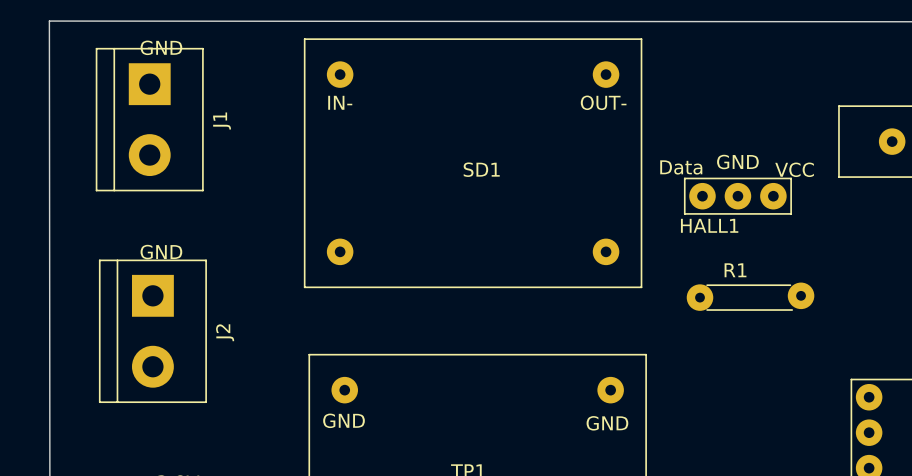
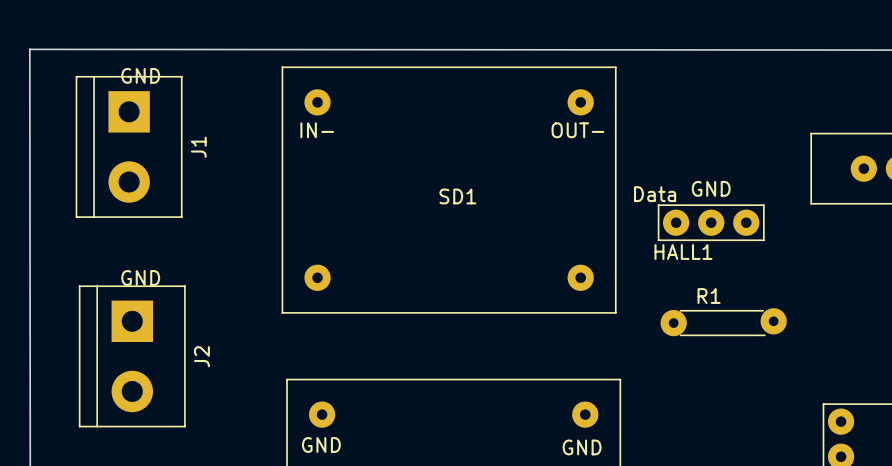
text: VCC (794, 169) -> none

